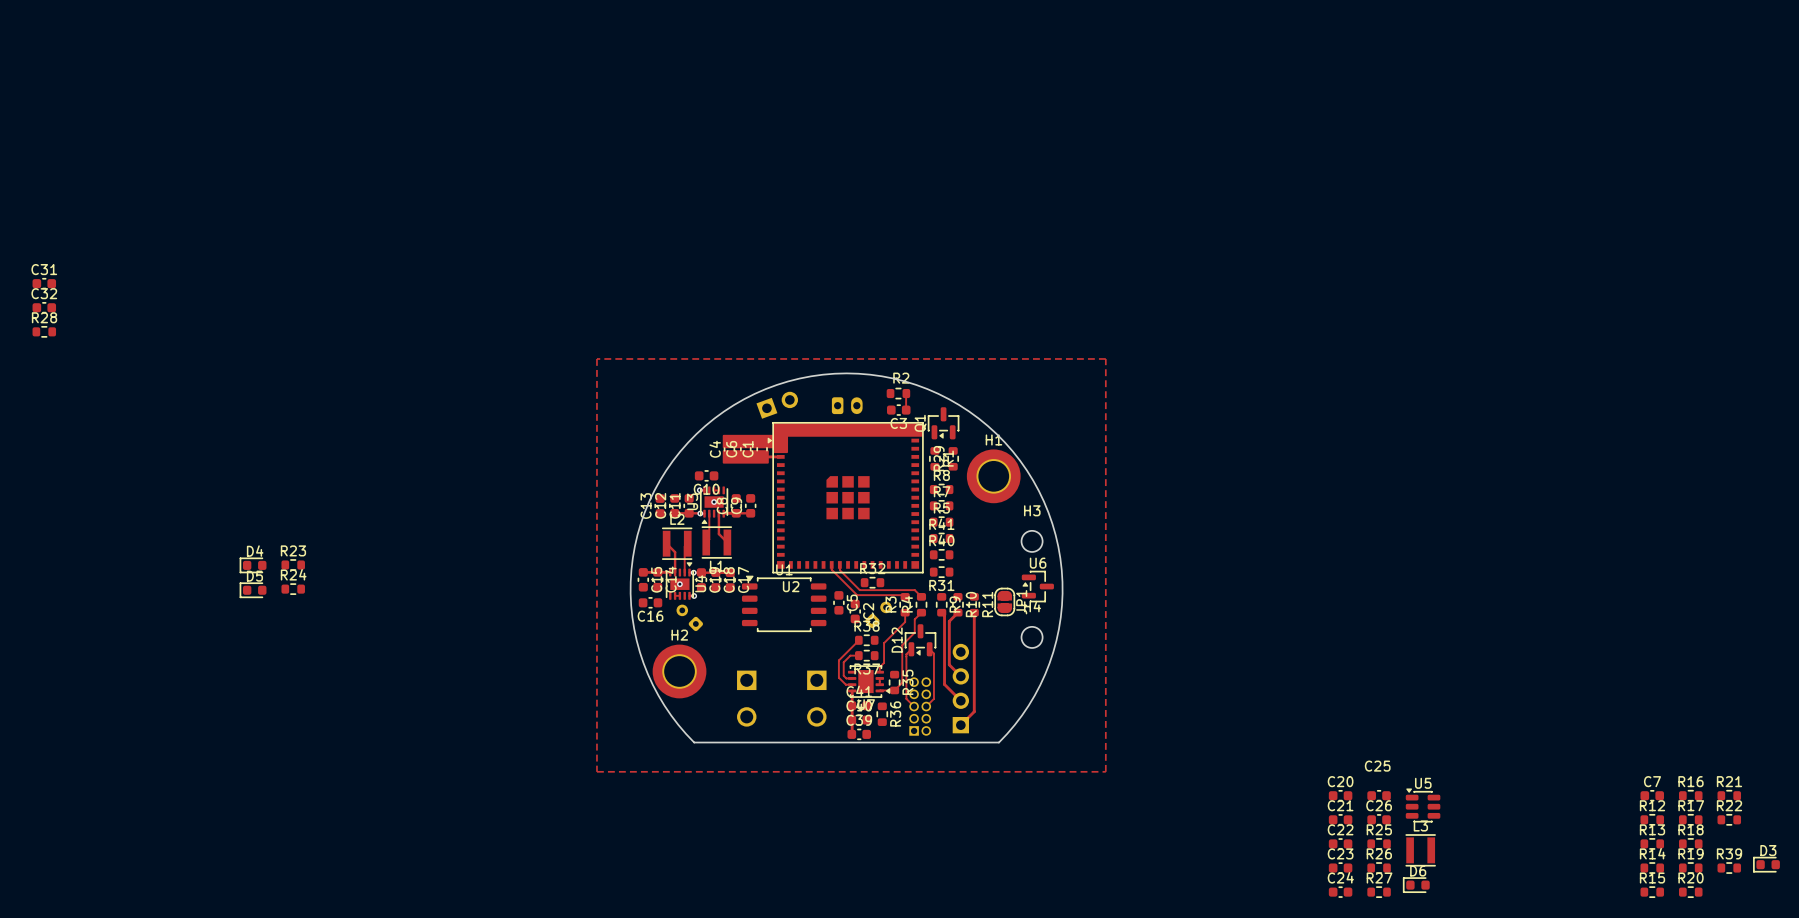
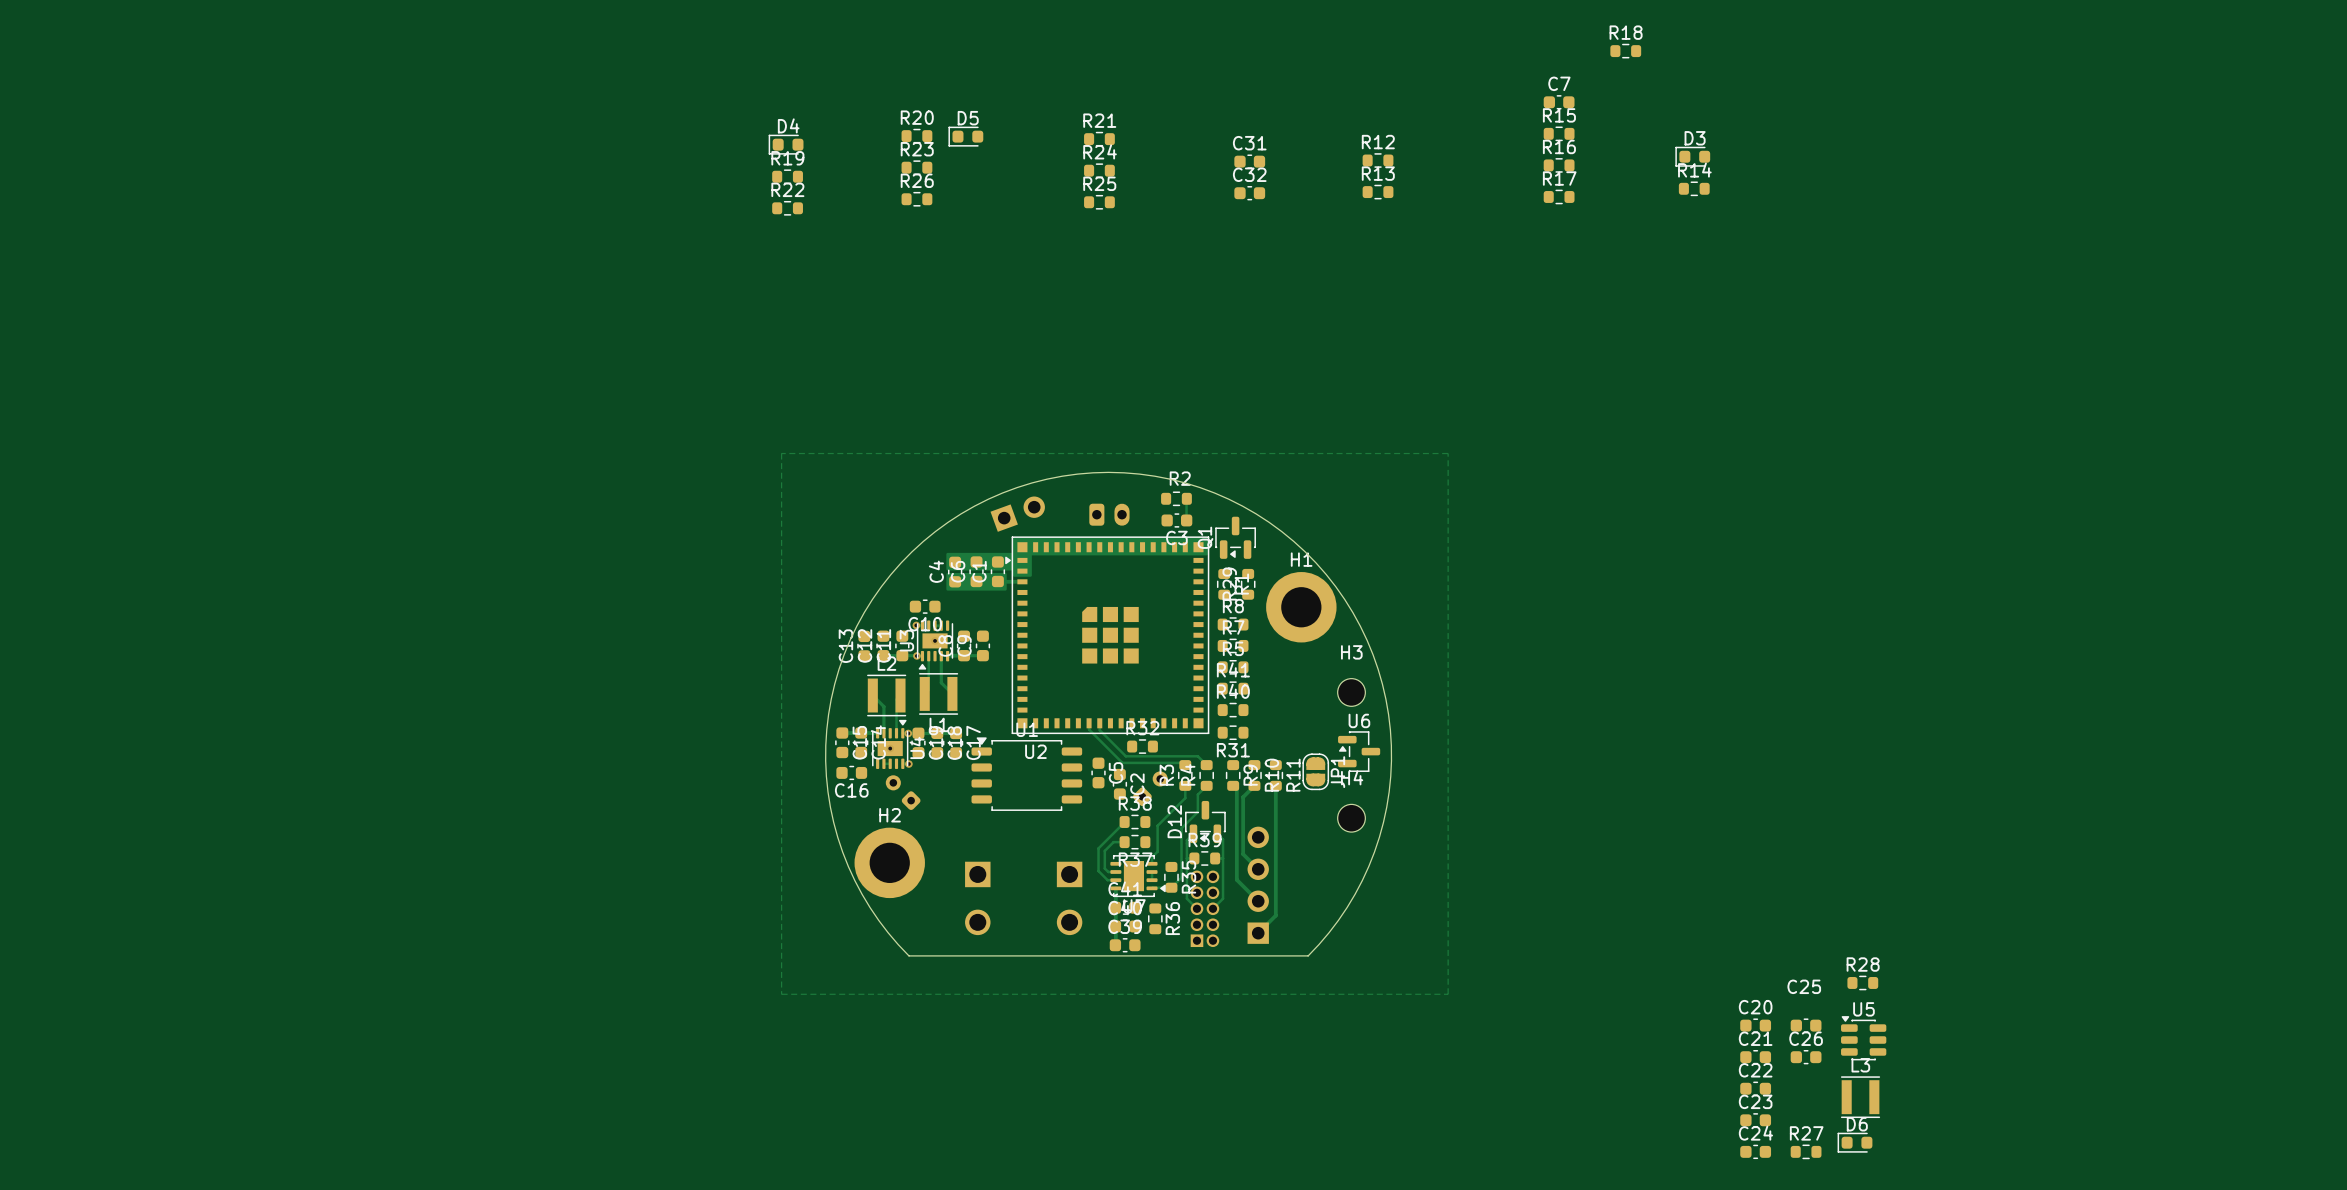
C31 position: (44, 283) -> (1249, 161)
C32 position: (44, 307) -> (1249, 193)
R28 position: (44, 331) -> (1862, 982)
D4 position: (253, 565) -> (786, 144)
R23 position: (293, 565) -> (916, 167)
R24 position: (293, 589) -> (1099, 170)
D5 position: (253, 590) -> (965, 136)
C7 position: (1652, 795) -> (1559, 102)
R16 position: (1690, 795) -> (1559, 165)
R21 position: (1729, 795) -> (1099, 139)
R12 position: (1652, 819) -> (1378, 160)
R17 position: (1690, 819) -> (1559, 196)
R22 position: (1729, 819) -> (787, 208)
R25 position: (1379, 843) -> (1099, 202)
R13 position: (1652, 843) -> (1378, 192)
R18 position: (1690, 843) -> (1625, 51)
D3 position: (1766, 864) -> (1692, 156)
R26 position: (1379, 868) -> (916, 199)
R14 position: (1652, 868) -> (1694, 188)
R19 position: (1690, 868) -> (787, 176)
R39 position: (1729, 868) -> (1204, 858)
R15 position: (1652, 892) -> (1559, 133)
R20 position: (1690, 892) -> (916, 136)

